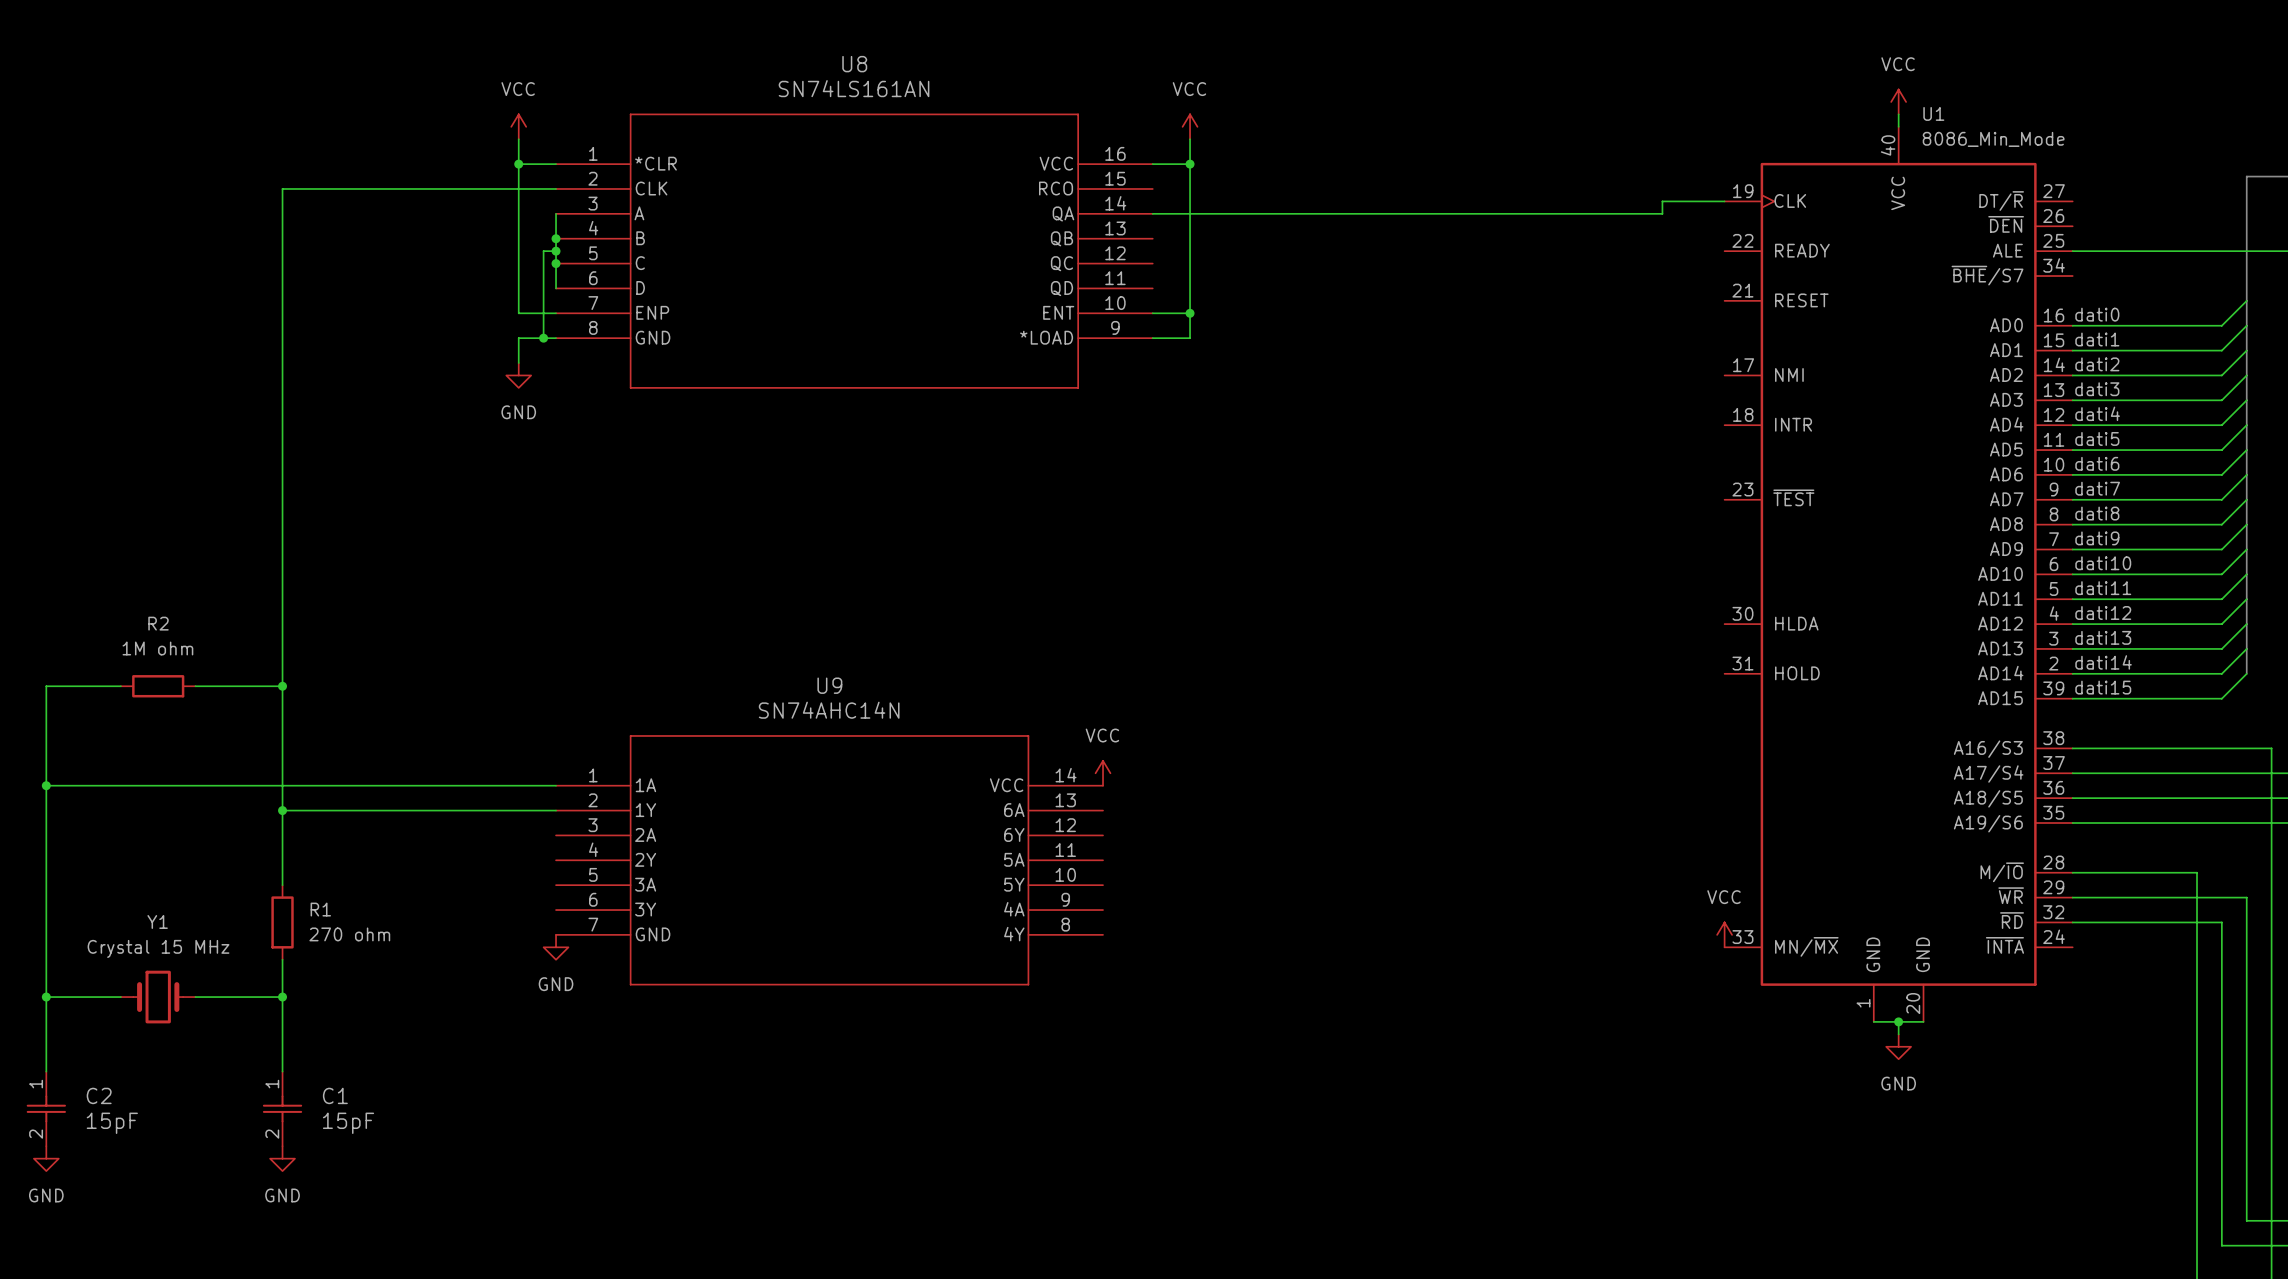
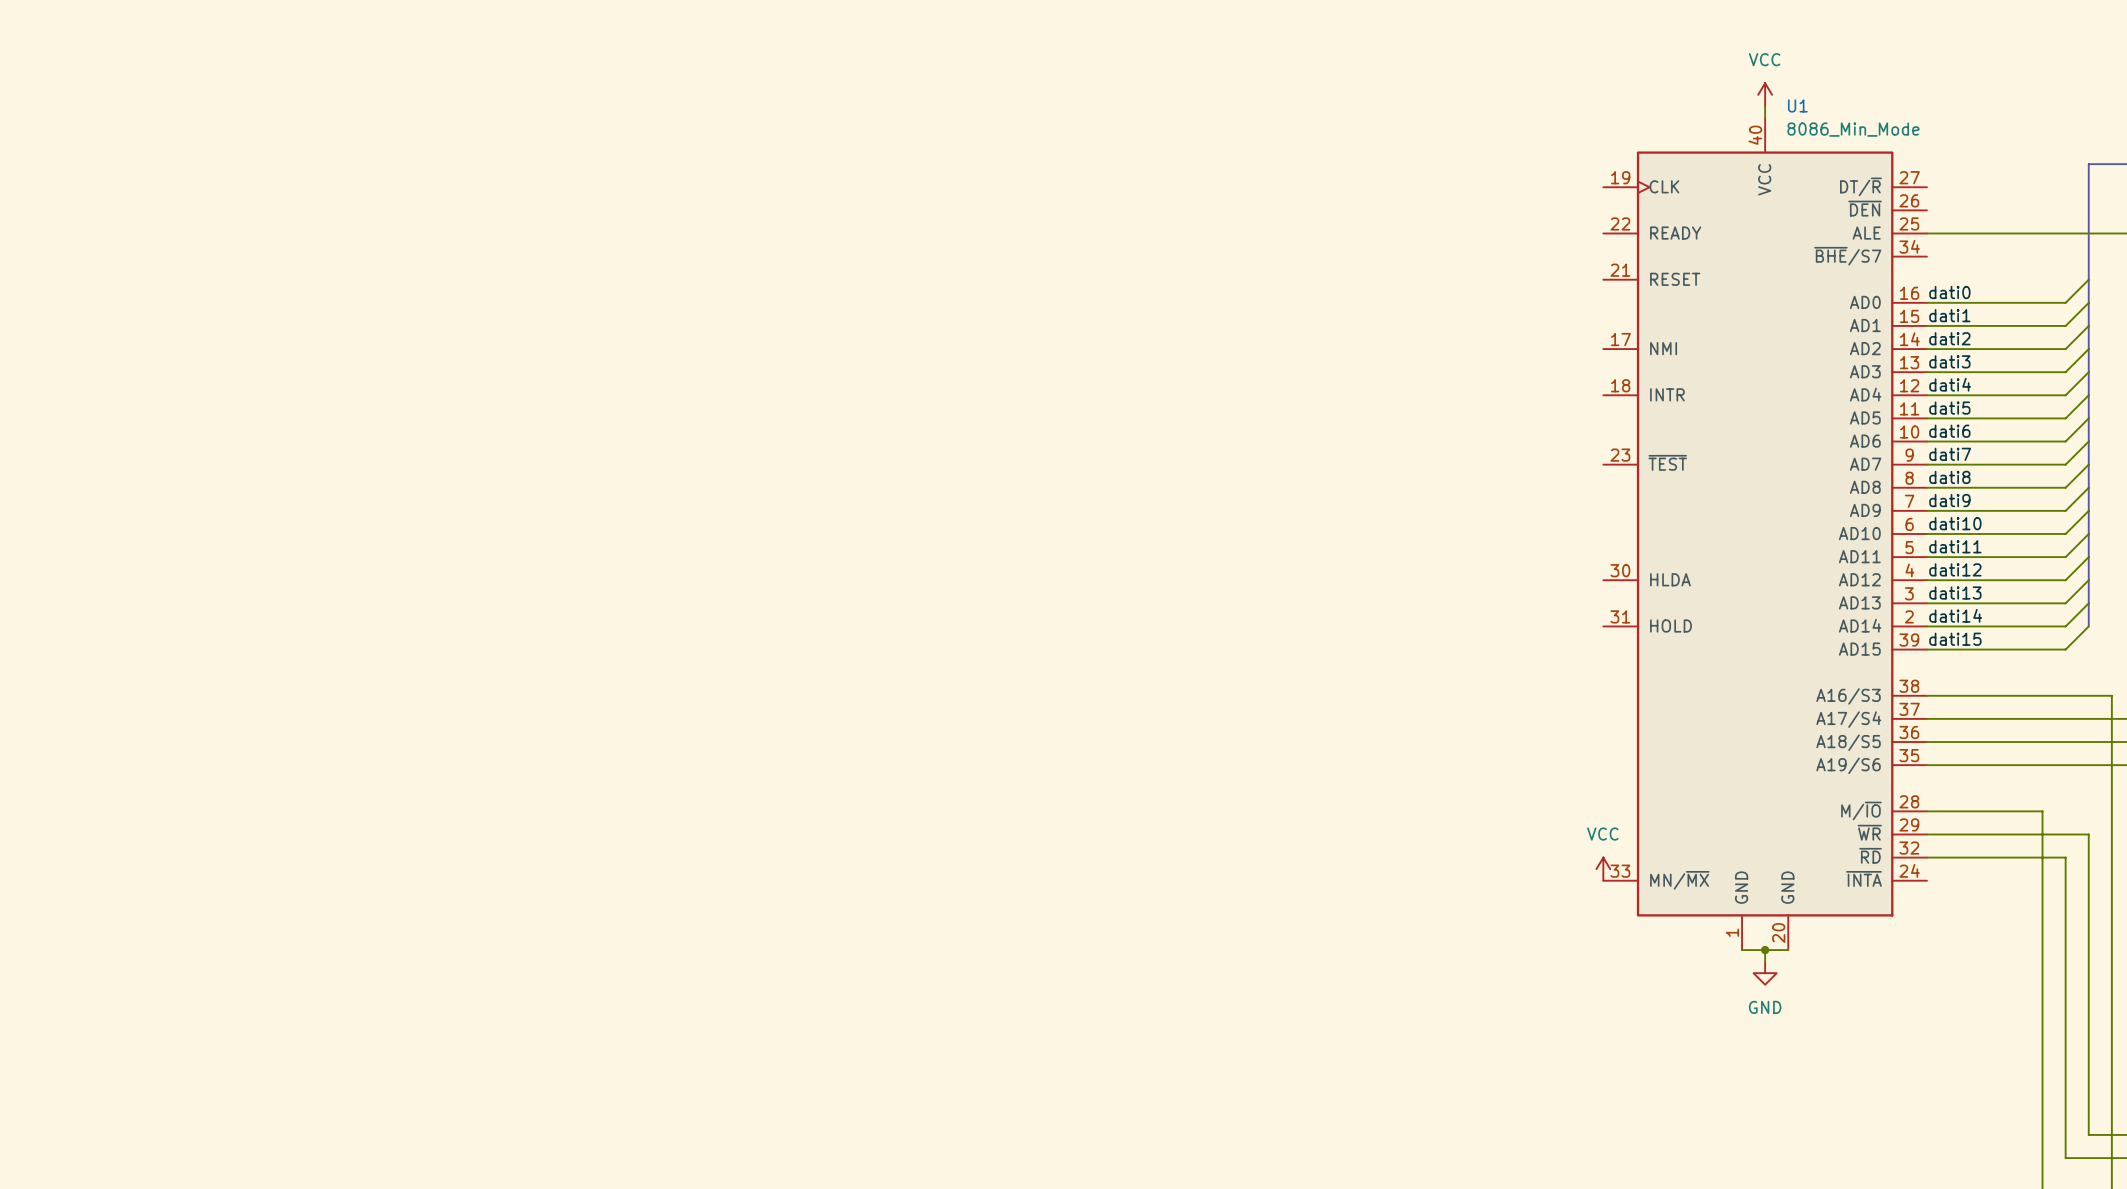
power symbol: VCC (518, 126) -> none
power symbol: VCC (1190, 126) -> none
wire: (518, 139) (518, 313) (556, 313) -> none
wire: (1190, 139) (1190, 338) (1152, 338) -> none
wire: (518, 164) (556, 164) -> none
junction: (518, 164) -> none
wire: (1152, 164) (1190, 164) -> none
junction: (1190, 164) -> none
wire: (556, 188) (282, 188) (282, 885) -> none
wire: (1724, 201) (1662, 201) (1662, 213) (1152, 213) -> none
wire: (556, 213) (556, 288) -> none
junction: (556, 238) -> none
wire: (556, 251) (543, 251) (543, 338) -> none
junction: (556, 251) -> none
U8: SN74LS161AN (854, 251) -> none
junction: (556, 263) -> none
wire: (1152, 313) (1190, 313) -> none
junction: (1190, 313) -> none
junction: (543, 338) -> none
wire: (556, 338) (518, 338) (518, 363) -> none
power symbol: GND (518, 375) -> none
wire: (120, 686) (46, 686) (46, 1071) -> none
R2: 1M ohm (158, 686) -> none
wire: (195, 686) (282, 686) -> none
junction: (282, 686) -> none
power symbol: VCC (1103, 773) -> none
wire: (46, 785) (556, 785) -> none
junction: (46, 785) -> none
wire: (282, 810) (556, 810) -> none
junction: (282, 810) -> none
U9: SN74AHC14N (829, 860) -> none
R1: 270 ohm (282, 922) -> none
power symbol: GND (556, 947) -> none
wire: (282, 959) (282, 1071) -> none
wire: (46, 997) (120, 997) -> none
junction: (46, 997) -> none
Y1: Crystal 15 MHz (158, 997) -> none
wire: (195, 997) (282, 997) -> none
junction: (282, 997) -> none
C2: 15pF (46, 1108) -> none
C1: 15pF (282, 1108) -> none
power symbol: GND (46, 1158) -> none
power symbol: GND (282, 1158) -> none

